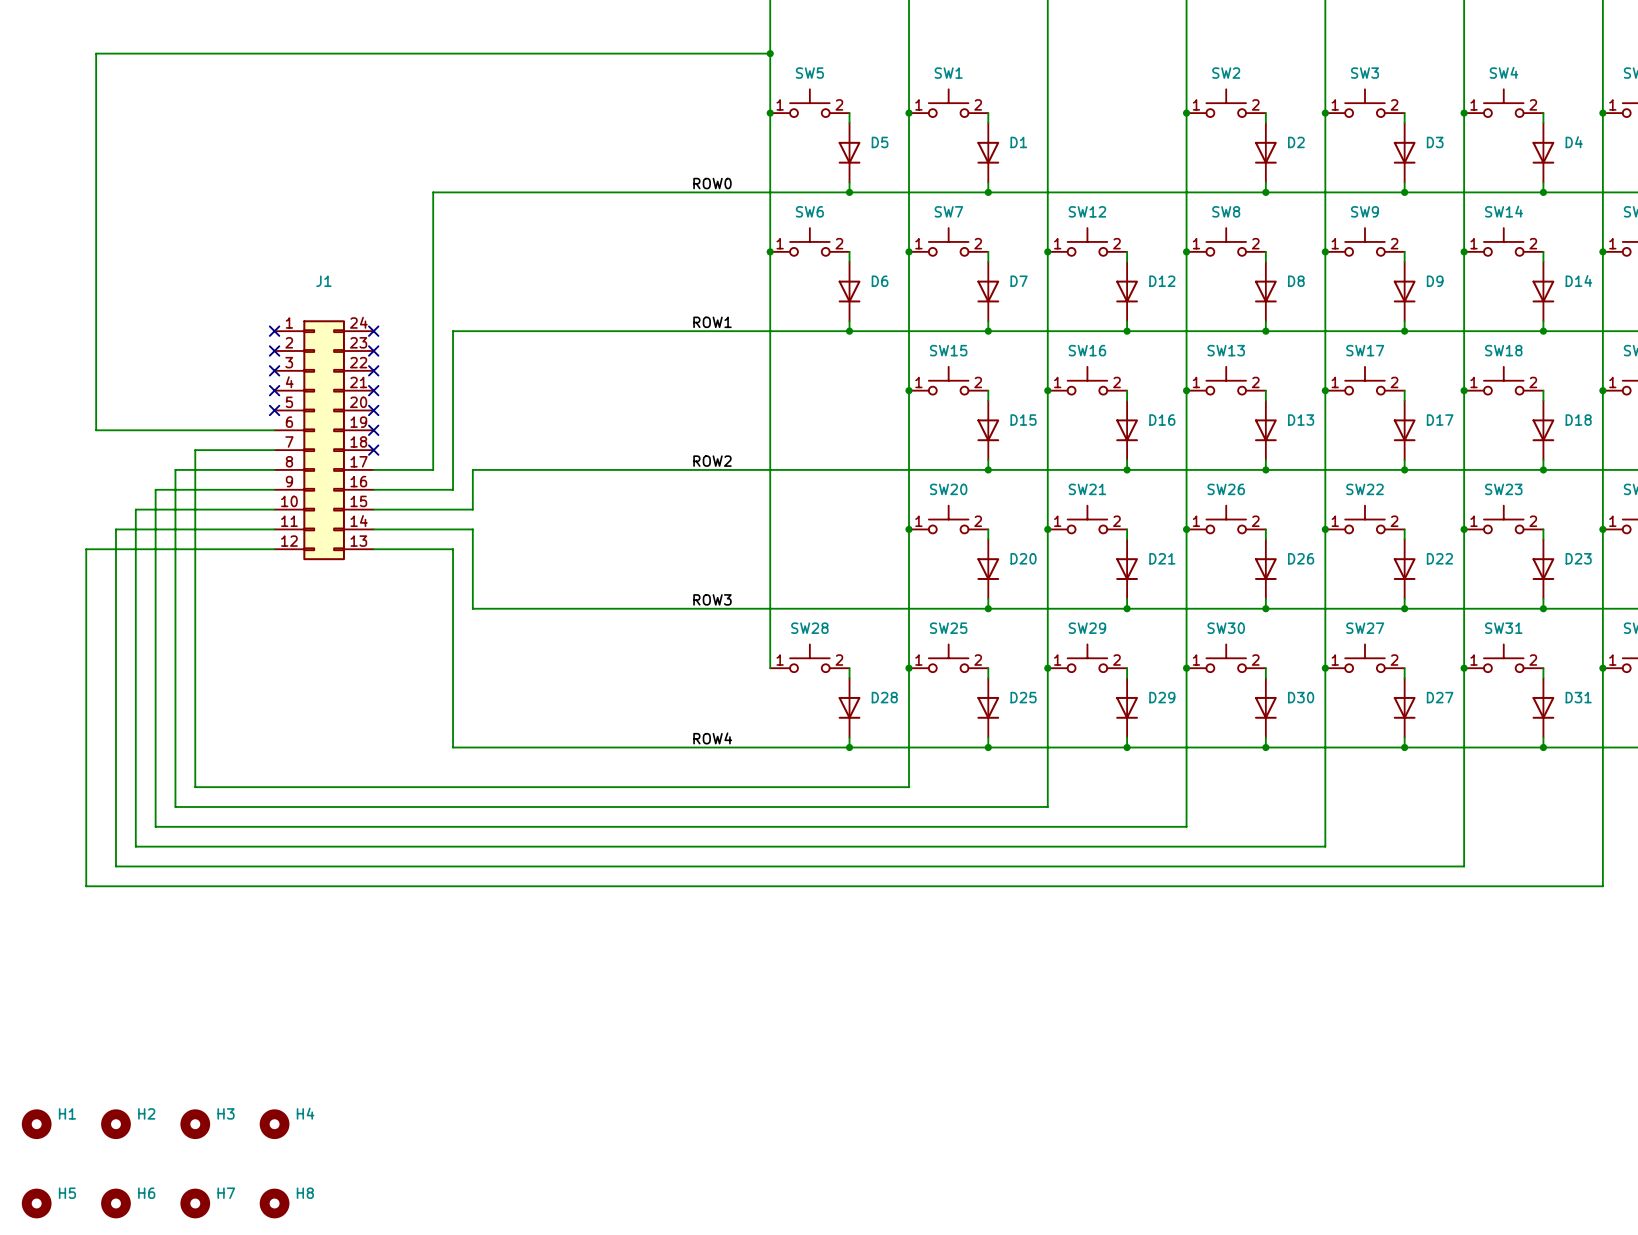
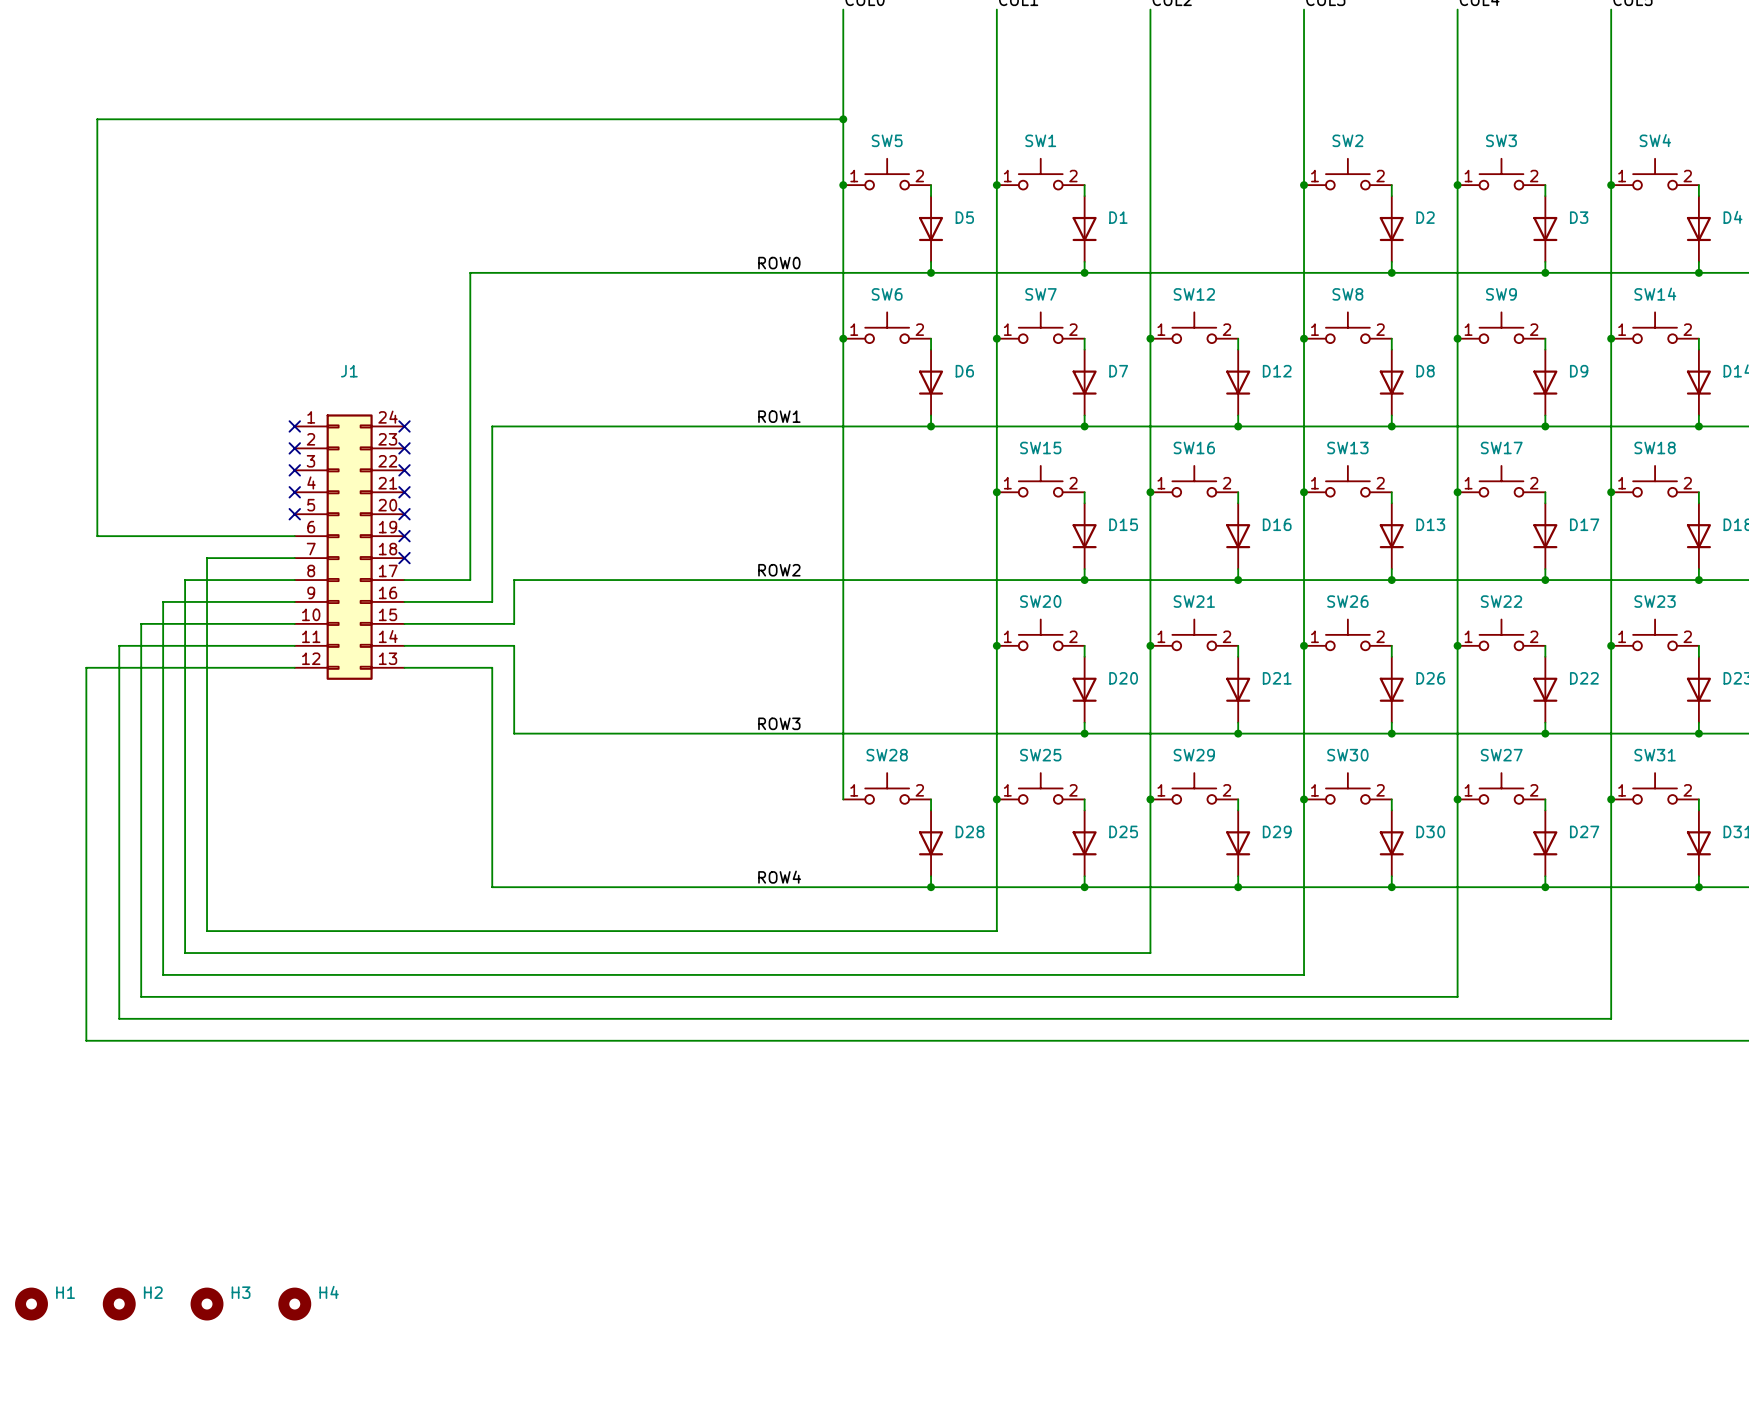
H5: (36, 1203) -> none
H6: (115, 1203) -> none
H7: (195, 1203) -> none
H8: (274, 1203) -> none

